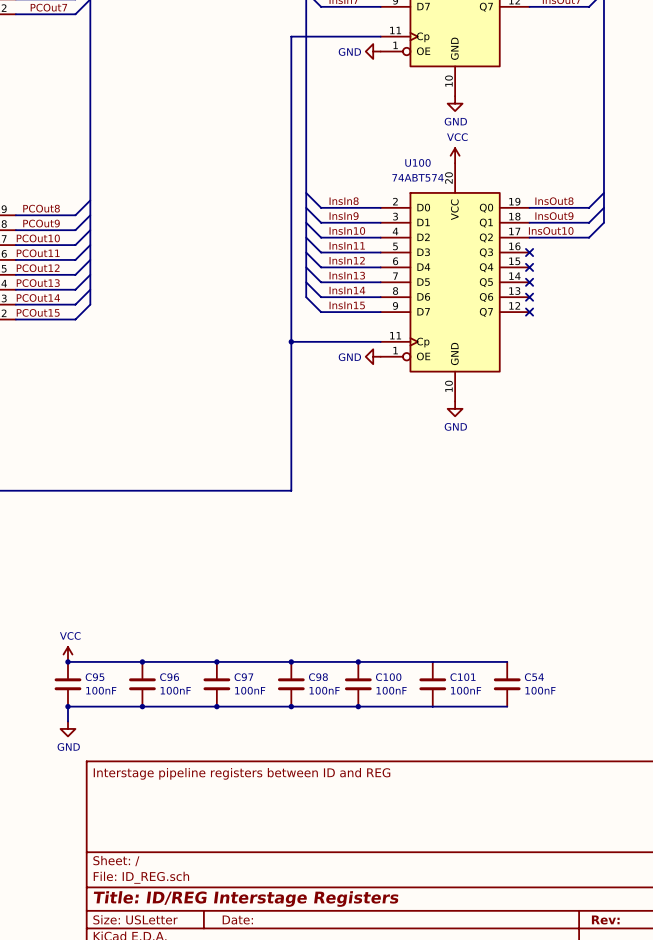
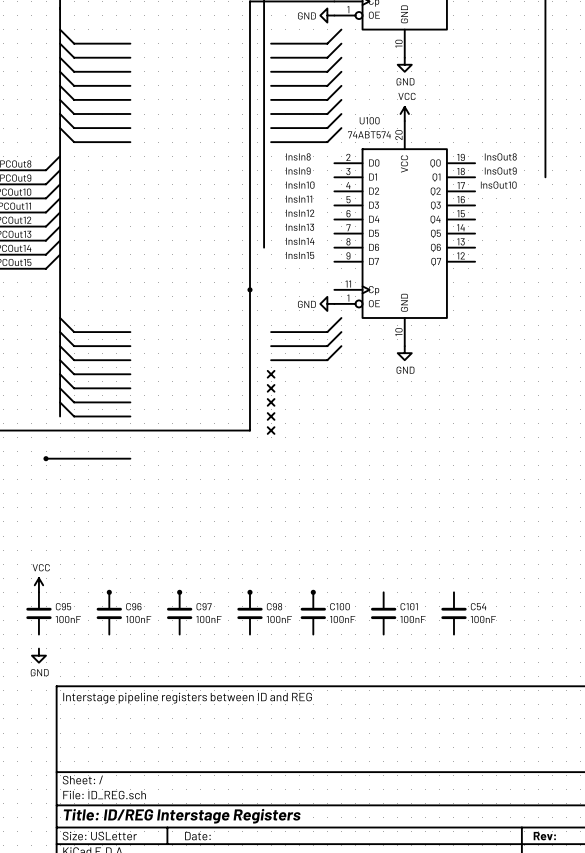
wire: none -> (60, 29) (74, 43) (130, 43)
wire: none -> (341, 29) (327, 43) (271, 43)
wire: none -> (60, 43) (74, 57) (130, 57)
wire: none -> (341, 43) (327, 57) (271, 57)
wire: none -> (60, 57) (74, 71) (130, 71)
wire: none -> (341, 57) (327, 71) (271, 71)
wire: none -> (60, 71) (74, 85) (130, 85)
wire: none -> (341, 71) (327, 85) (271, 85)
wire: none -> (60, 85) (74, 99) (130, 99)
wire: none -> (341, 85) (327, 99) (271, 99)
wire: none -> (60, 99) (74, 114) (130, 114)
wire: none -> (341, 99) (327, 114) (271, 114)
wire: none -> (60, 114) (74, 128) (130, 128)
wire: none -> (341, 114) (327, 128) (271, 128)
wire: none -> (60, 128) (74, 142) (130, 142)
wire: none -> (341, 128) (327, 142) (271, 142)
wire: (306, 192) (321, 207) (380, 207) -> none
wire: (603, 192) (589, 207) (529, 207) -> none
wire: (306, 207) (321, 222) (380, 222) -> none
wire: (603, 207) (589, 222) (529, 222) -> none
wire: (306, 222) (321, 237) (380, 237) -> none
wire: (603, 222) (589, 237) (529, 237) -> none
wire: (306, 237) (321, 252) (380, 252) -> none
wire: (306, 252) (321, 267) (380, 267) -> none
no-connect mark: (529, 252) -> none
wire: (306, 267) (321, 282) (380, 282) -> none
no-connect mark: (529, 267) -> none
wire: (306, 282) (321, 297) (380, 297) -> none
no-connect mark: (529, 282) -> none
wire: (306, 297) (321, 312) (380, 312) -> none
no-connect mark: (529, 297) -> none
bus: none -> (60, 254) (60, 416)
no-connect mark: (529, 312) -> none
wire: (291, 341) (380, 341) -> none
wire: none -> (60, 317) (74, 332) (130, 332)
wire: none -> (341, 317) (327, 332) (271, 332)
wire: none -> (60, 332) (74, 346) (130, 346)
wire: none -> (341, 332) (327, 346) (271, 346)
wire: none -> (60, 346) (74, 360) (130, 360)
wire: none -> (341, 346) (327, 360) (271, 360)
wire: none -> (60, 360) (74, 374) (130, 374)
wire: none -> (60, 374) (74, 388) (130, 388)
no-connect mark: none -> (271, 374)
wire: none -> (60, 388) (74, 402) (130, 402)
no-connect mark: none -> (271, 388)
wire: none -> (60, 402) (74, 416) (130, 416)
no-connect mark: none -> (271, 402)
no-connect mark: none -> (271, 416)
no-connect mark: none -> (271, 430)
wire: none -> (46, 458) (130, 458)
junction: none -> (46, 458)
wire: (67, 661) (507, 661) -> none
junction: (67, 661) -> none
junction: (67, 706) -> none
junction: (142, 706) -> none
junction: (216, 706) -> none
junction: (291, 706) -> none
junction: (358, 706) -> none
wire: (507, 706) (67, 706) (67, 721) -> none

